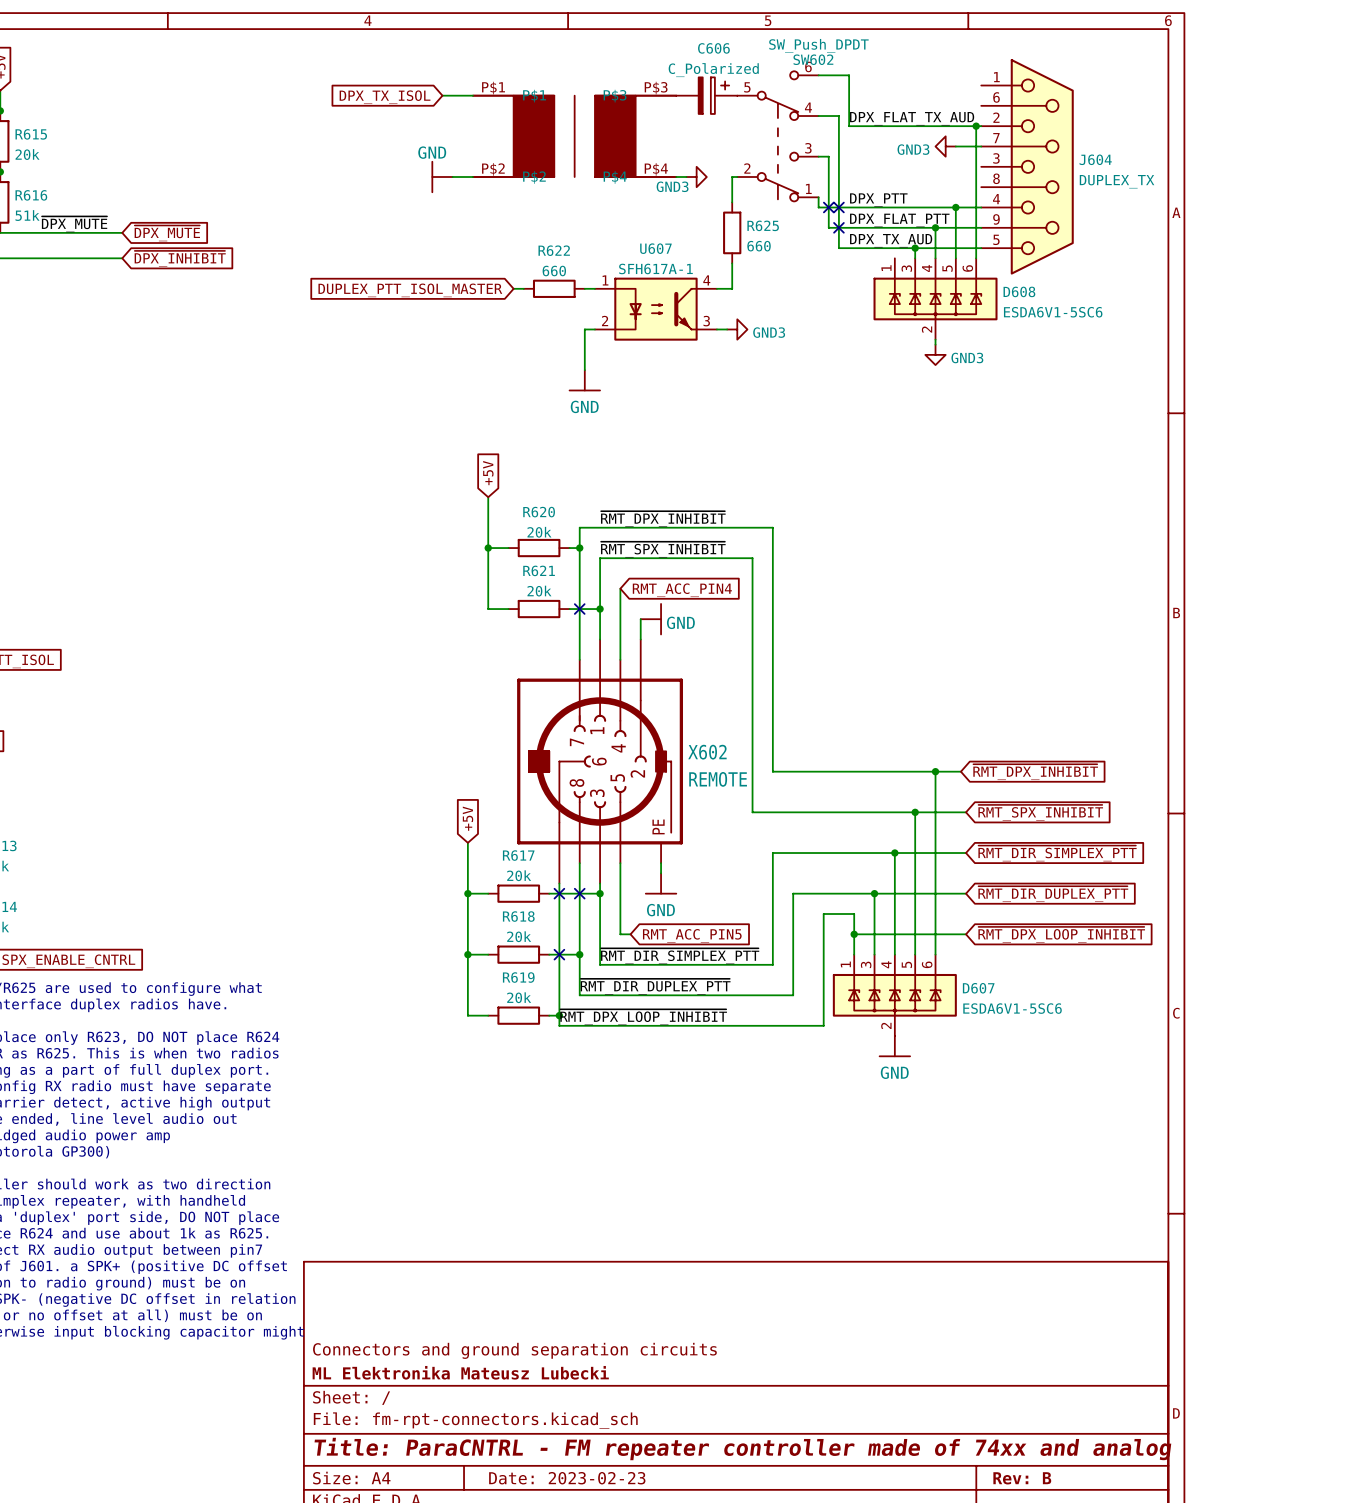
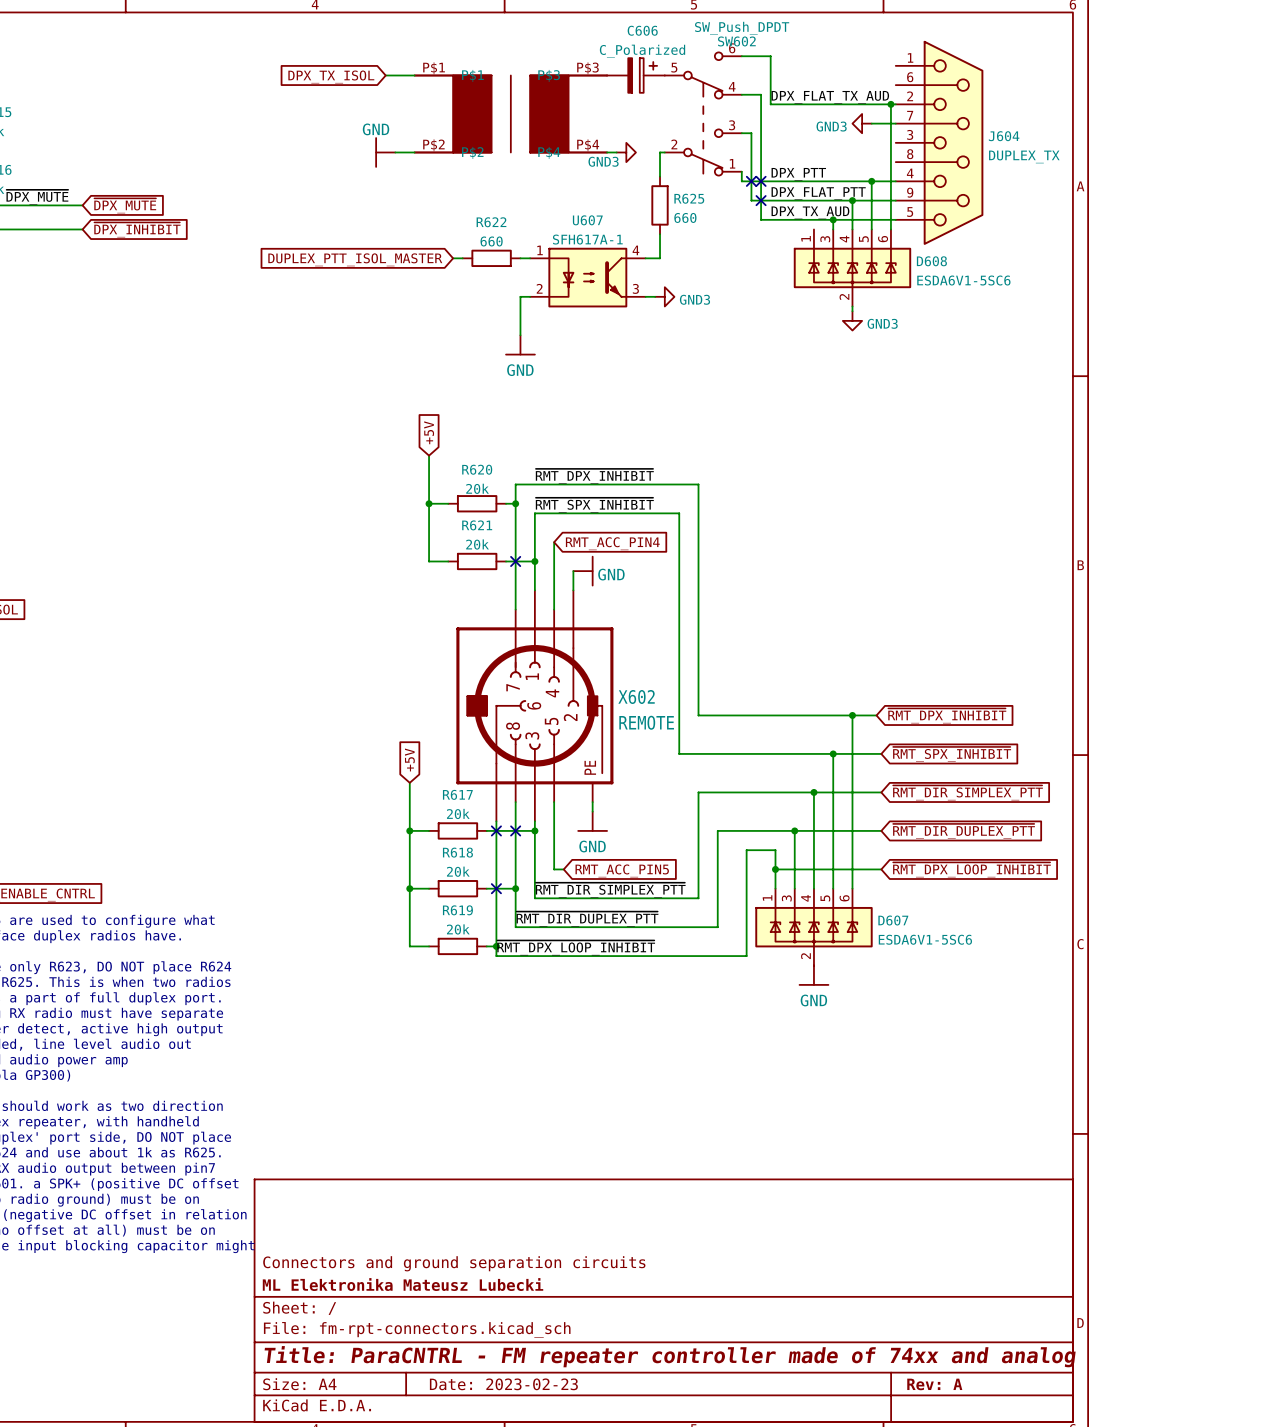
title block: Rev: B (1022, 1478) -> Rev: A (934, 1384)

